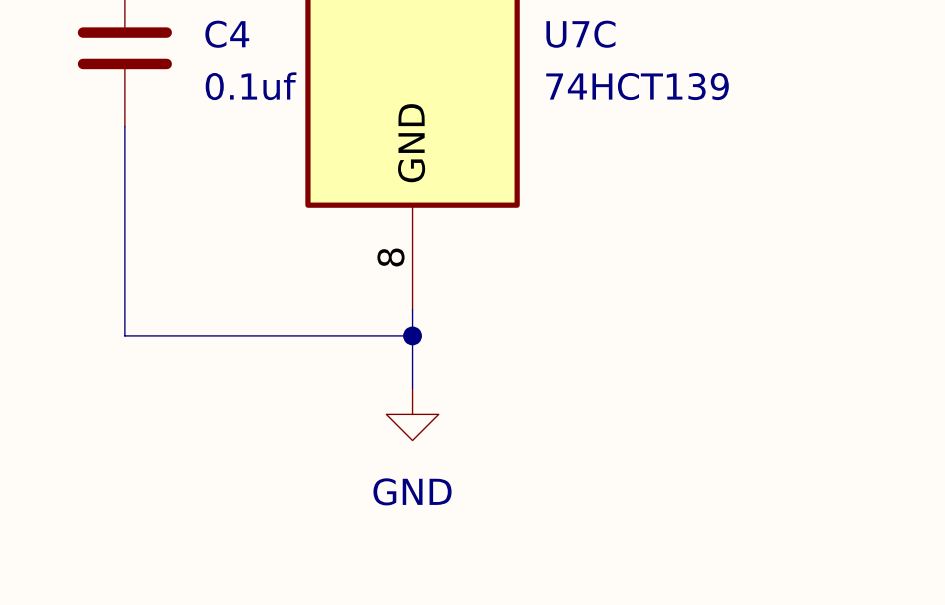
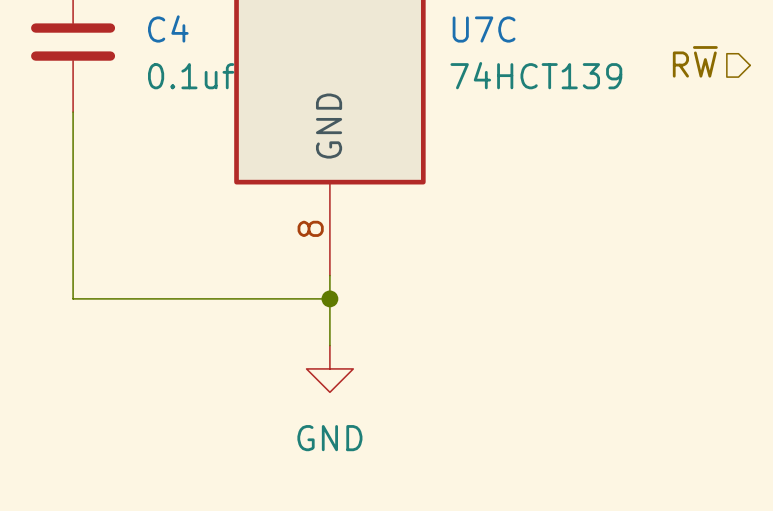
hierarchical label: none -> R~{W} (695, 61)

